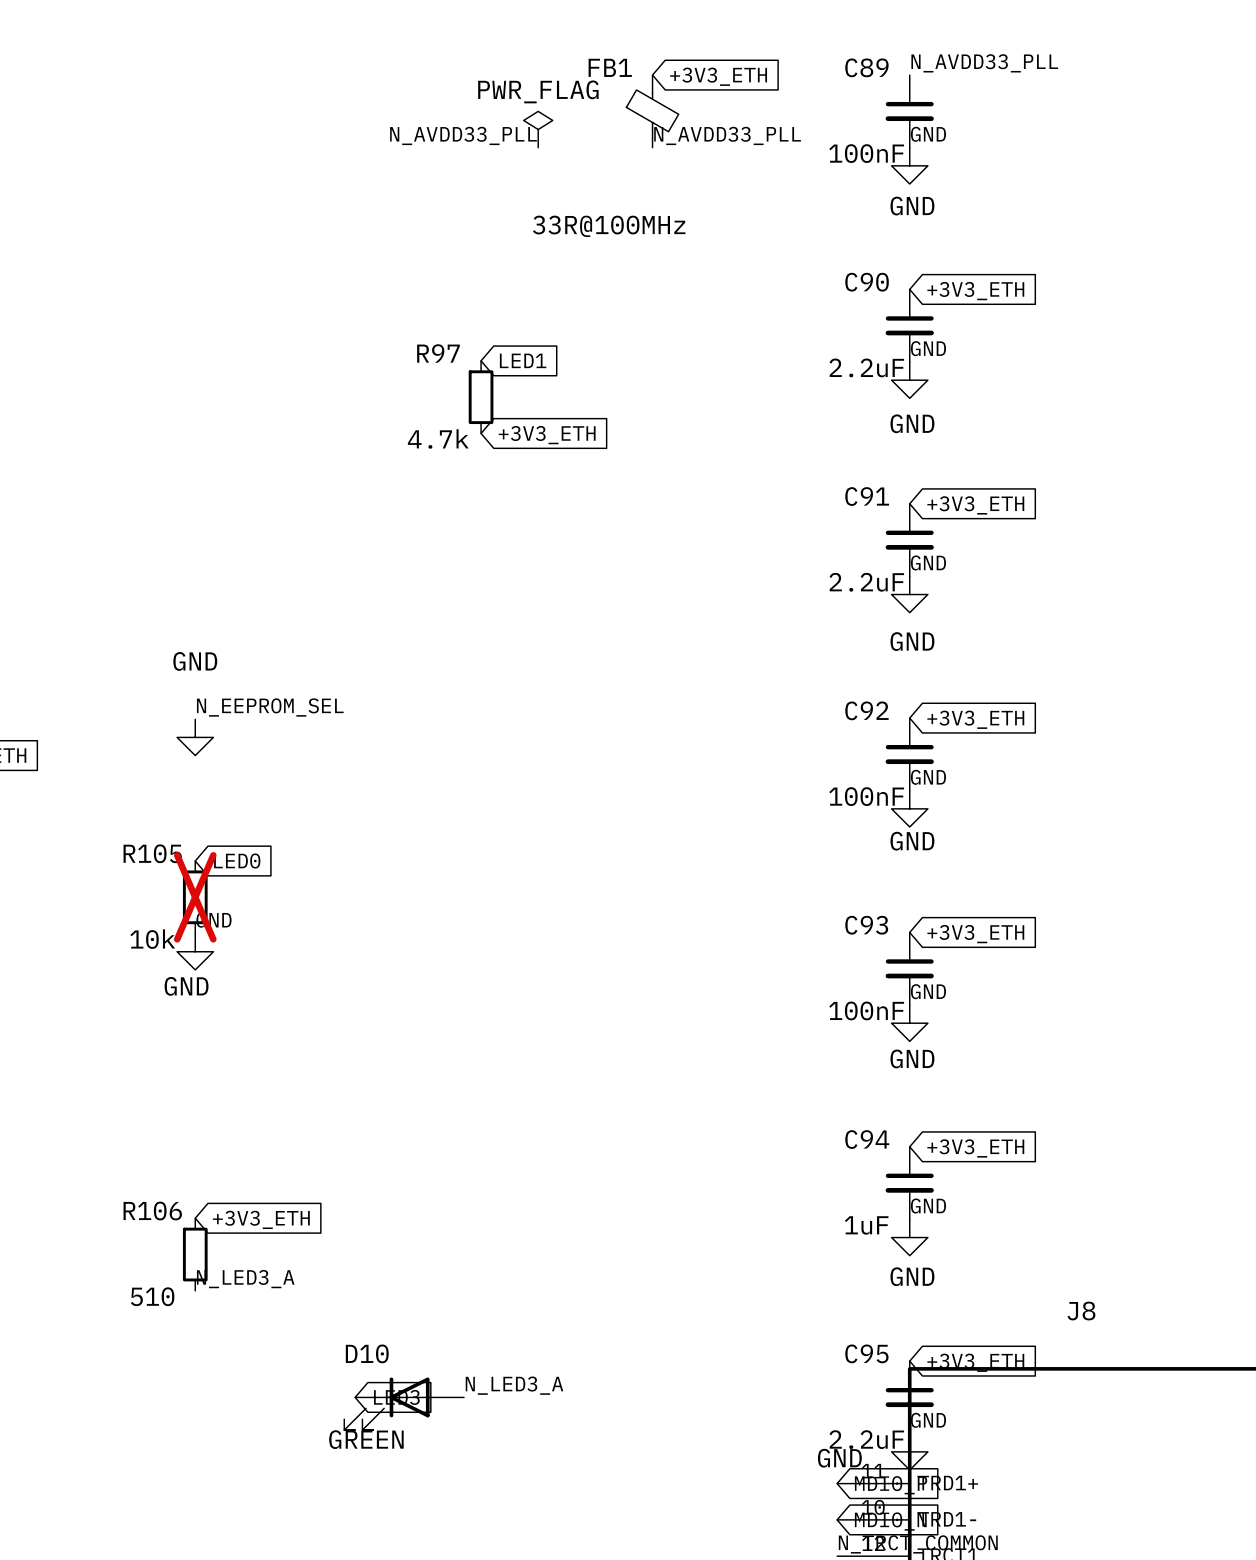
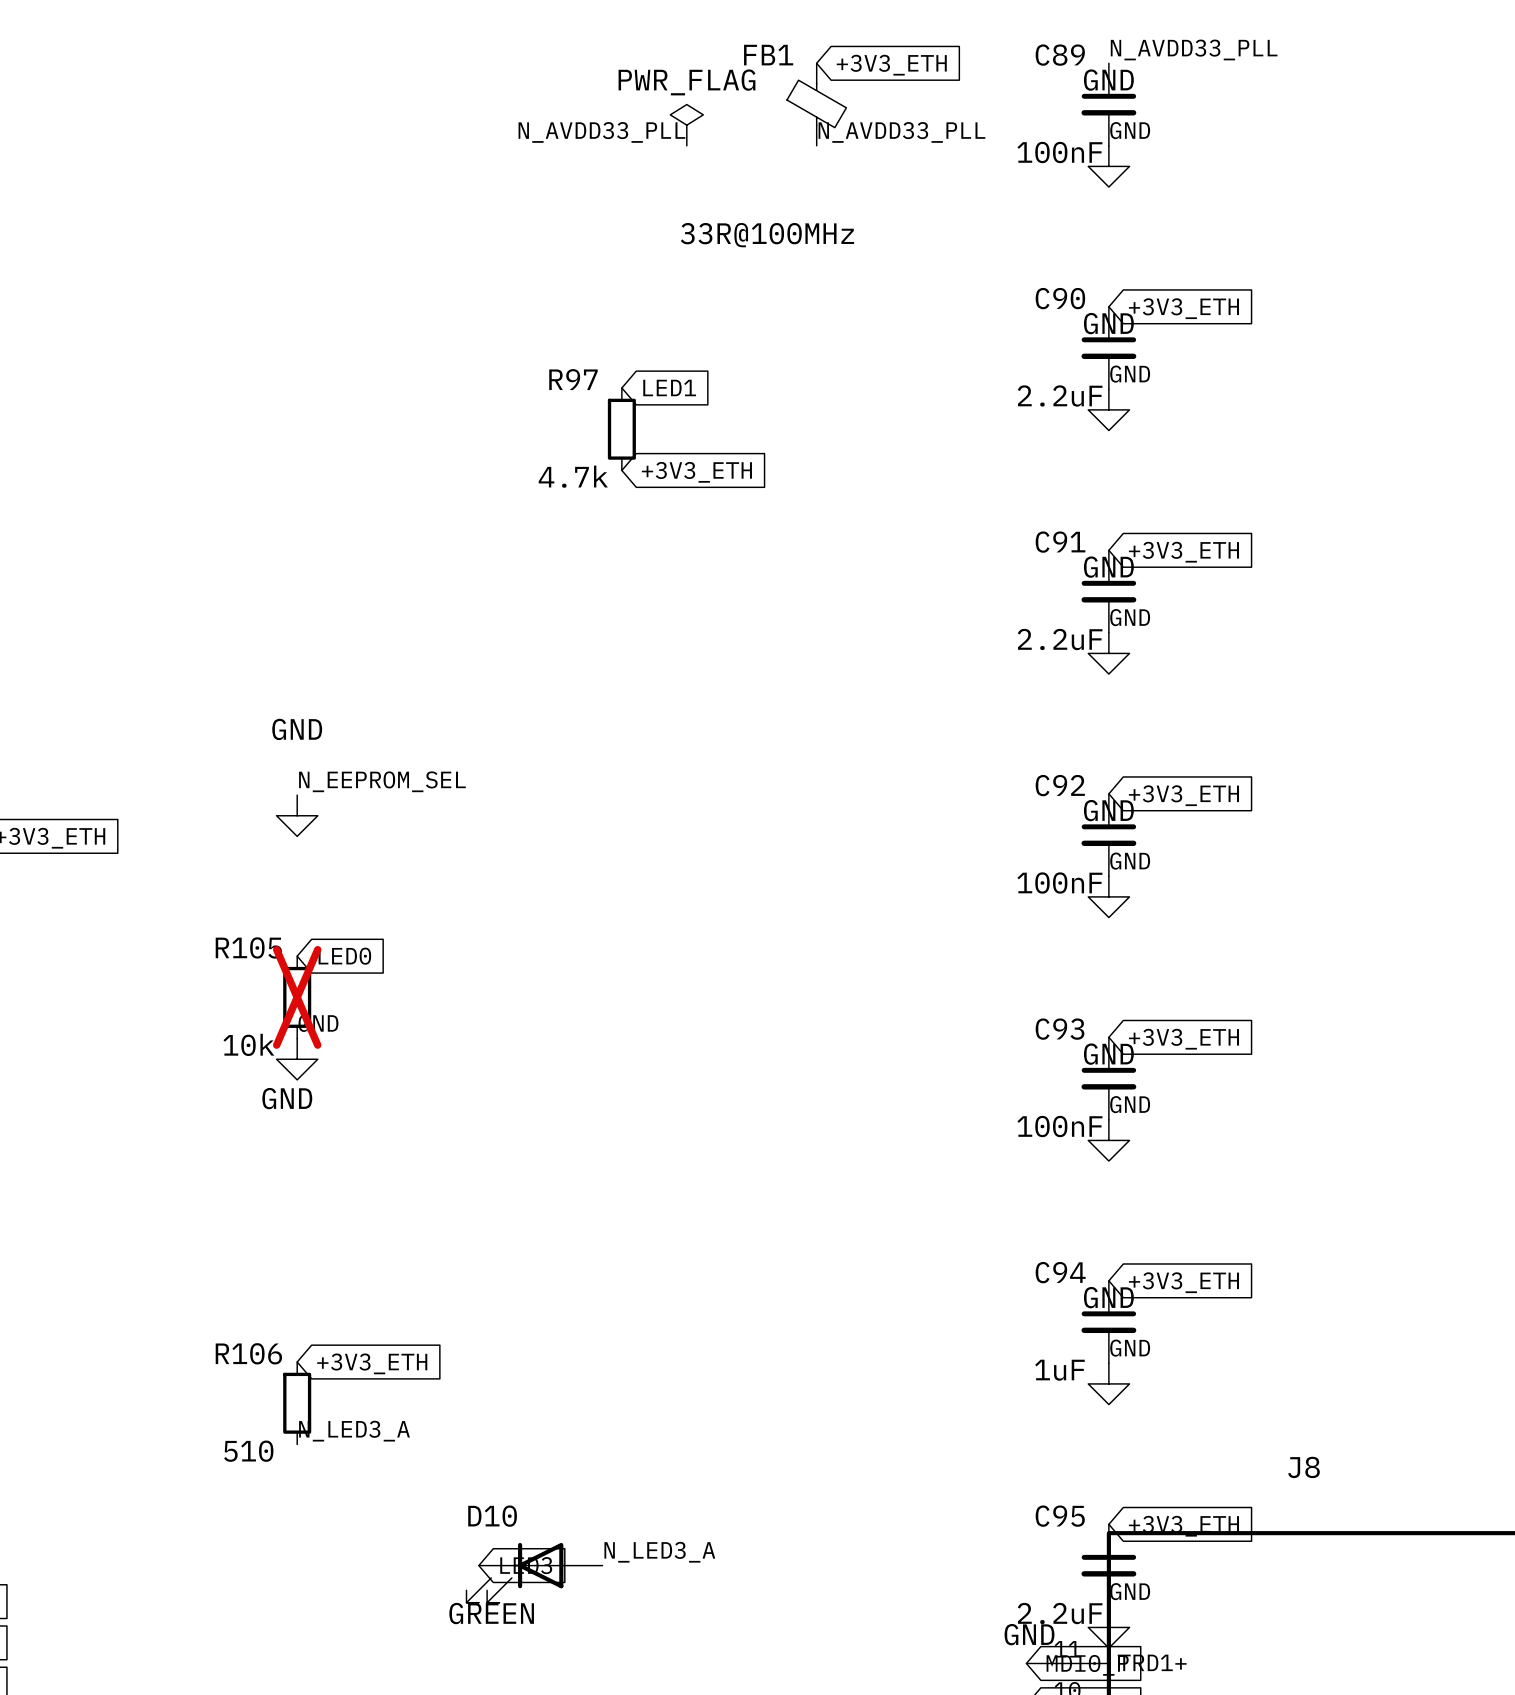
power symbol text position: GND (912, 206) -> GND (1108, 80)
power symbol text position: GND (912, 423) -> GND (1108, 323)
power symbol text position: GND (912, 641) -> GND (1108, 567)
power symbol text position: GND (912, 841) -> GND (1108, 810)
power symbol text position: GND (912, 1058) -> GND (1108, 1054)
power symbol text position: GND (912, 1276) -> GND (1108, 1297)

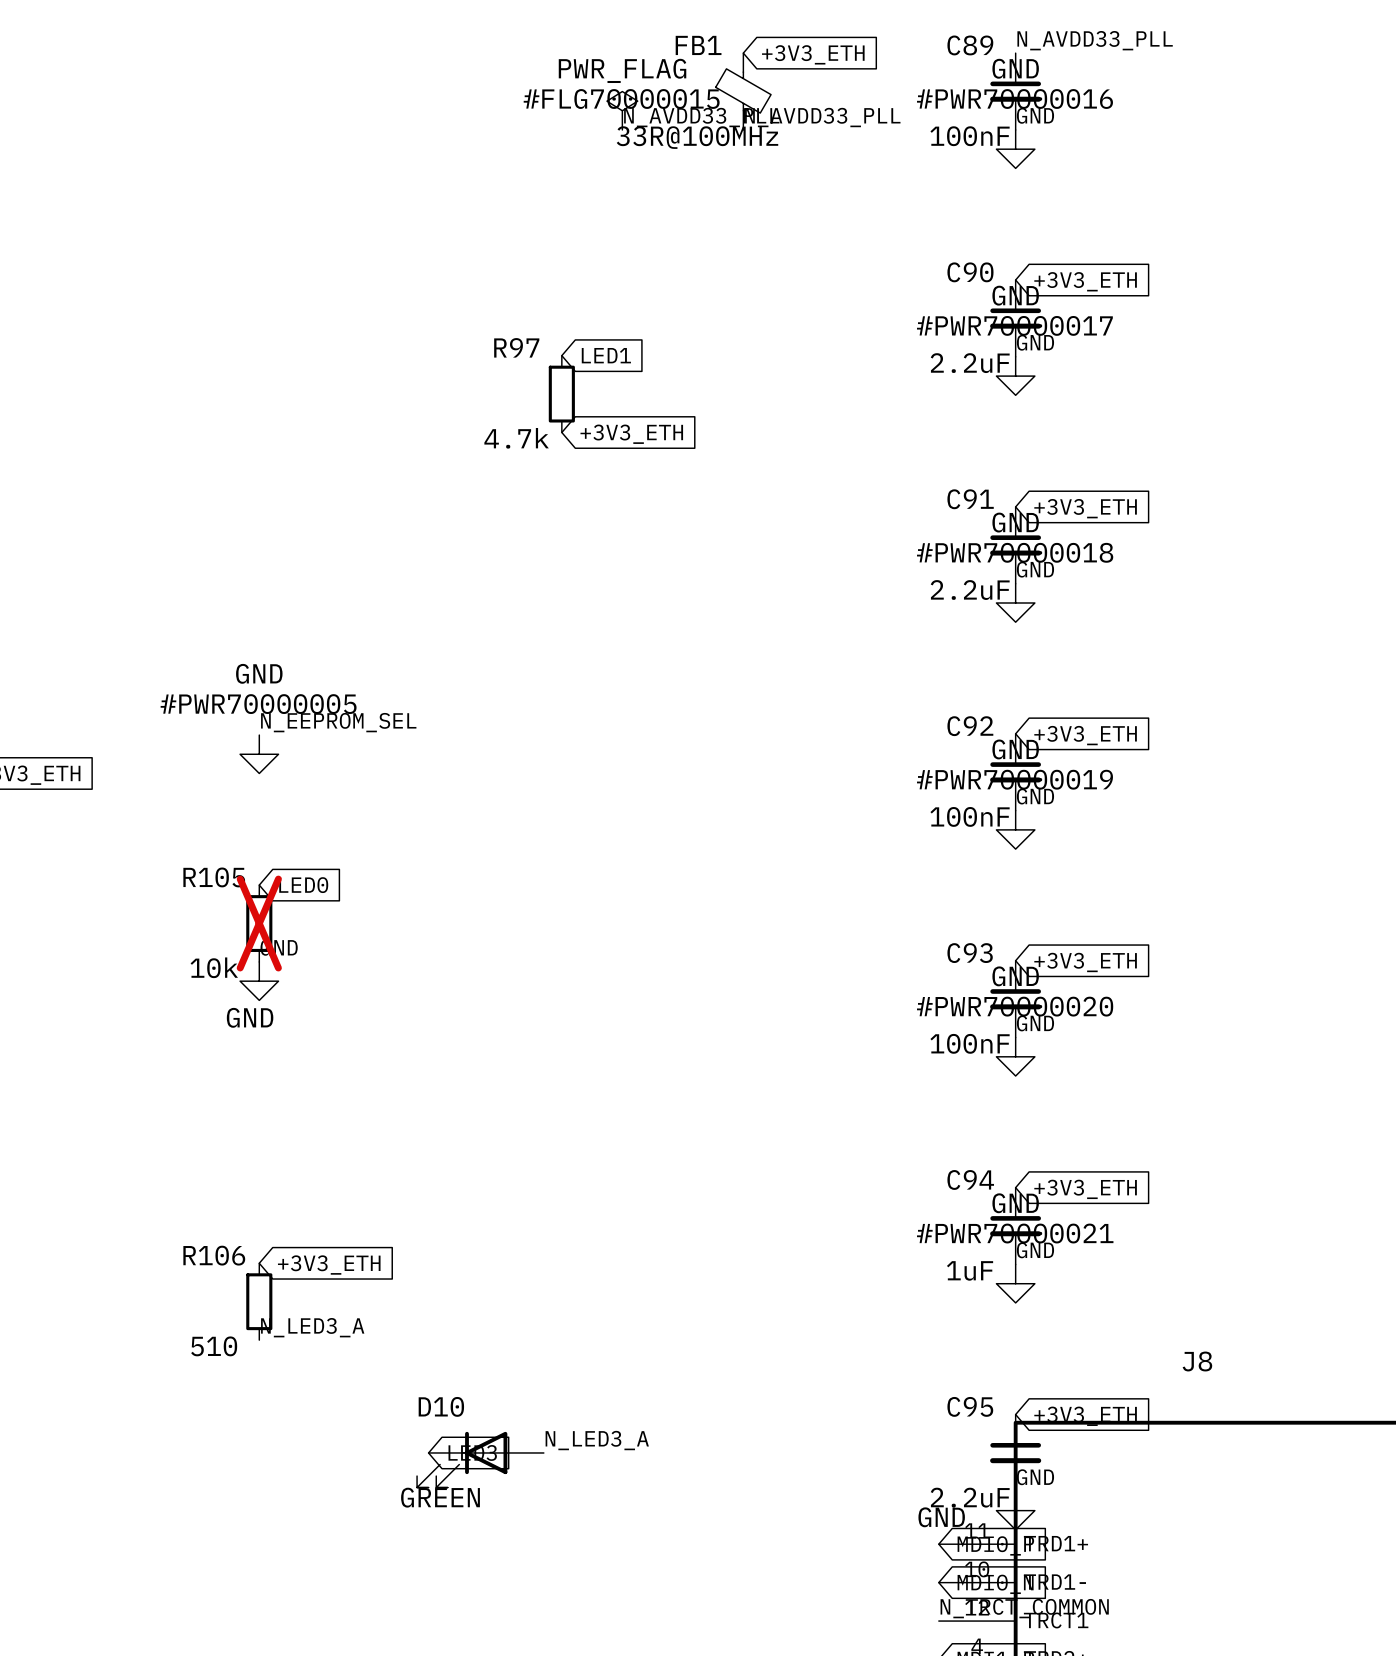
#FLG70000015 name: none -> #FLG70000015 (621, 99)
#PWR70000016 name: none -> #PWR70000016 (1014, 99)
label position: N_AVDD33_PLL (601, 132) -> N_AVDD33_PLL (701, 117)
FB1 value position: 33R@100MHz (767, 235) -> 33R@100MHz (697, 137)
#PWR70000017 name: none -> #PWR70000017 (1014, 325)
#PWR70000018 name: none -> #PWR70000018 (1015, 552)
#PWR70000005 name: none -> #PWR70000005 (258, 704)
#PWR70000019 name: none -> #PWR70000019 (1014, 779)
#PWR70000020 name: none -> #PWR70000020 (1015, 1006)
#PWR70000021 name: none -> #PWR70000021 (1015, 1233)

